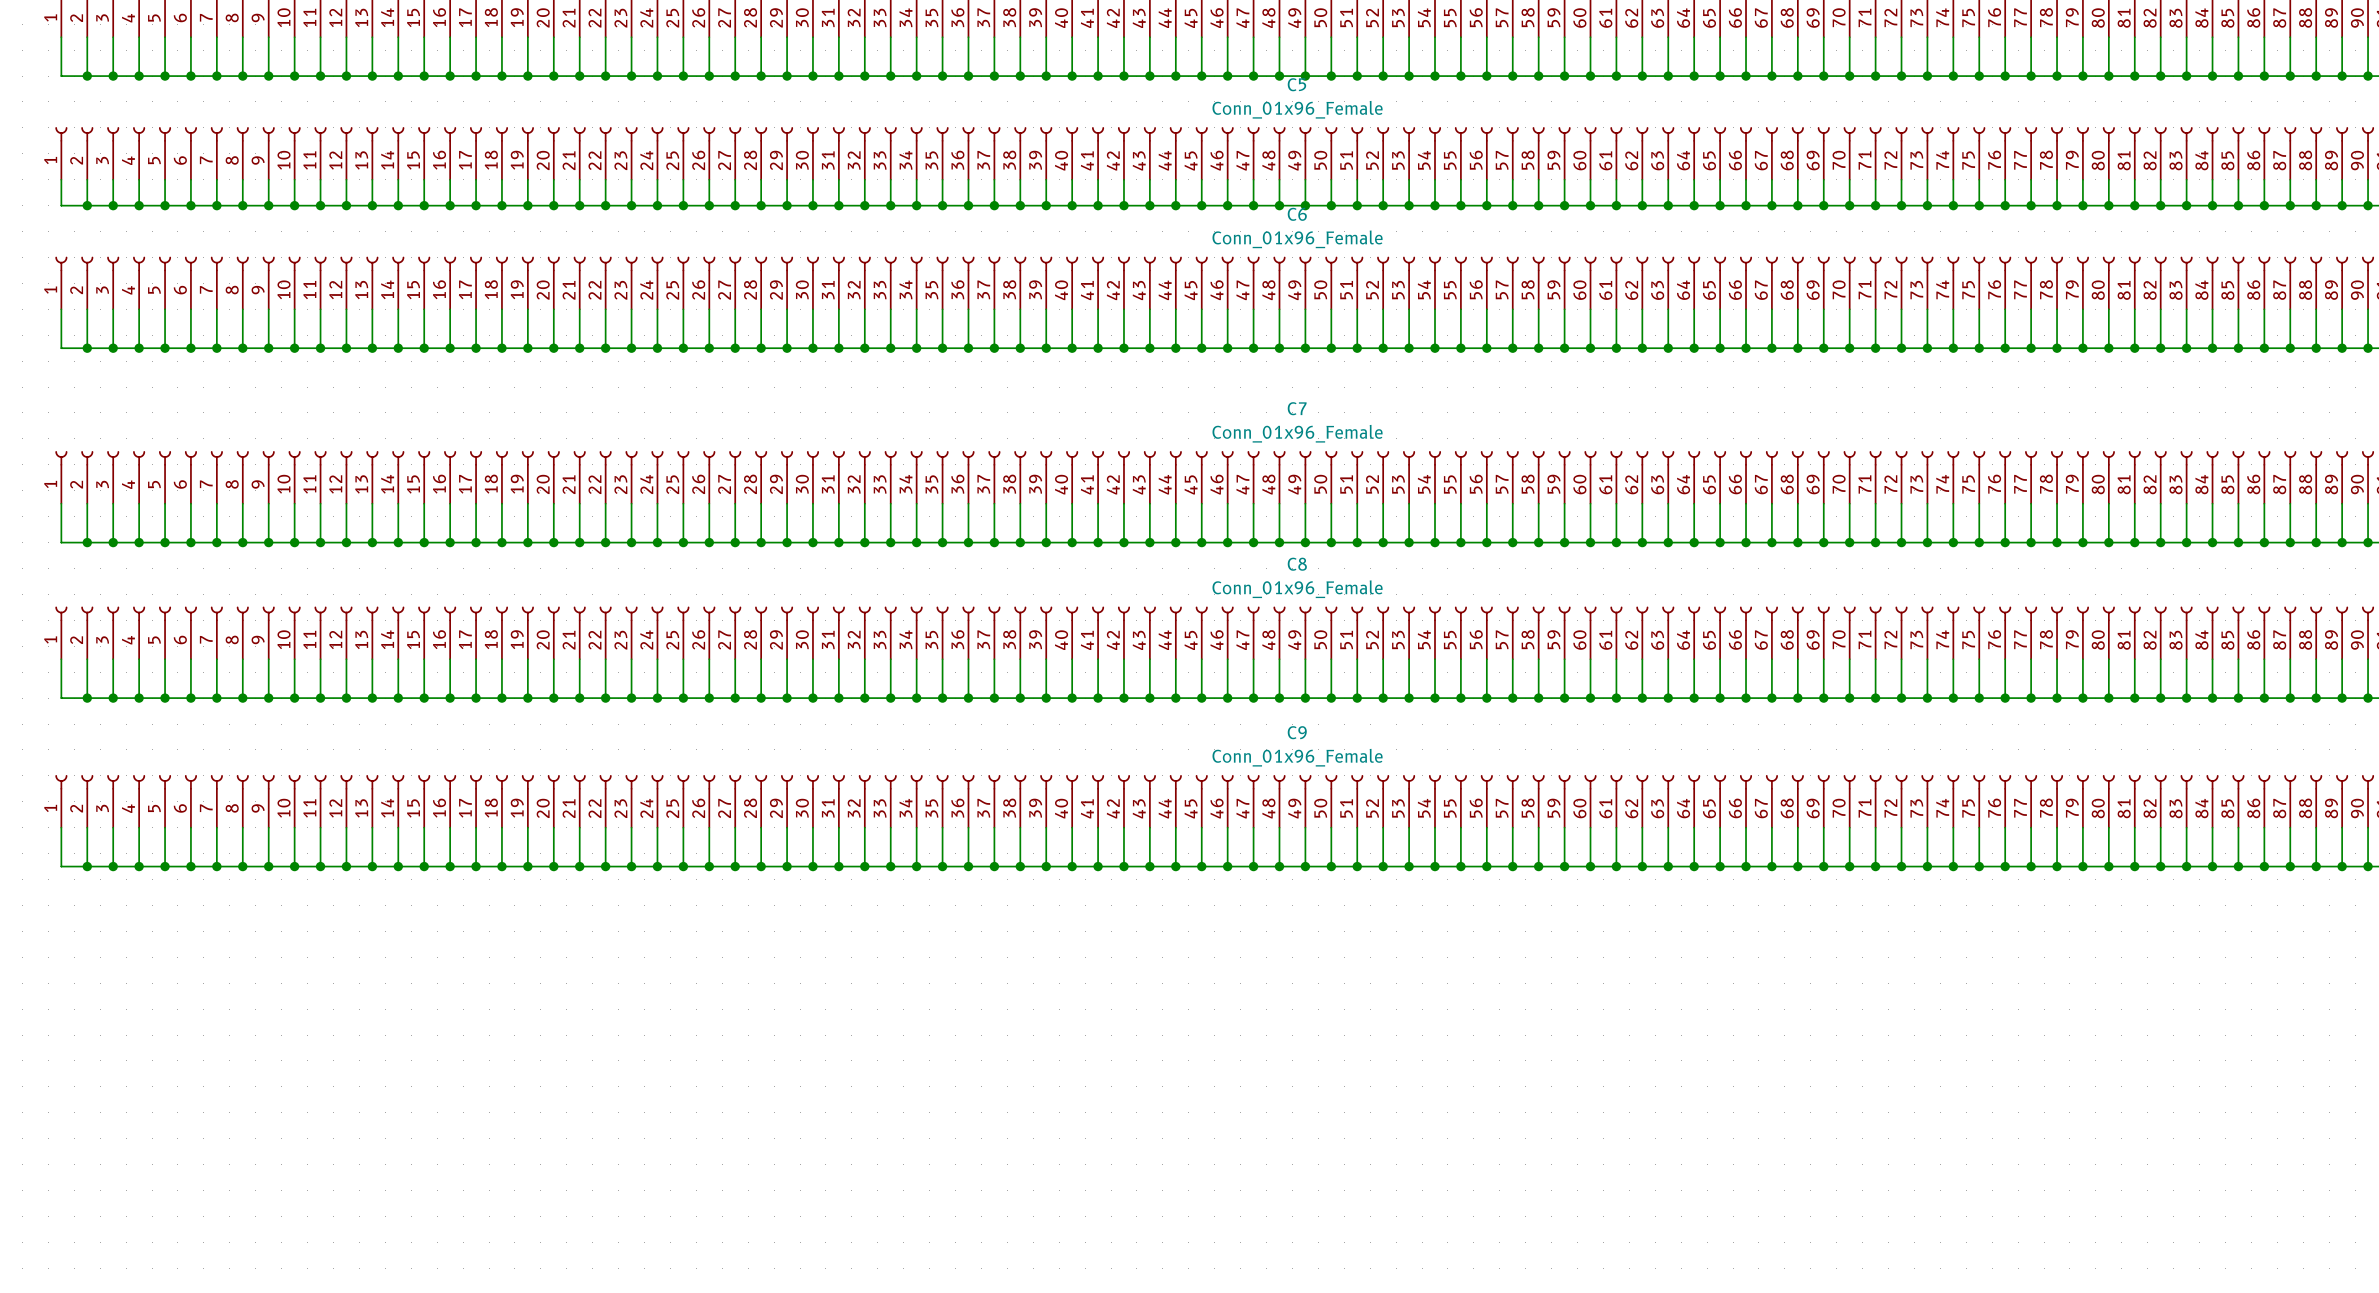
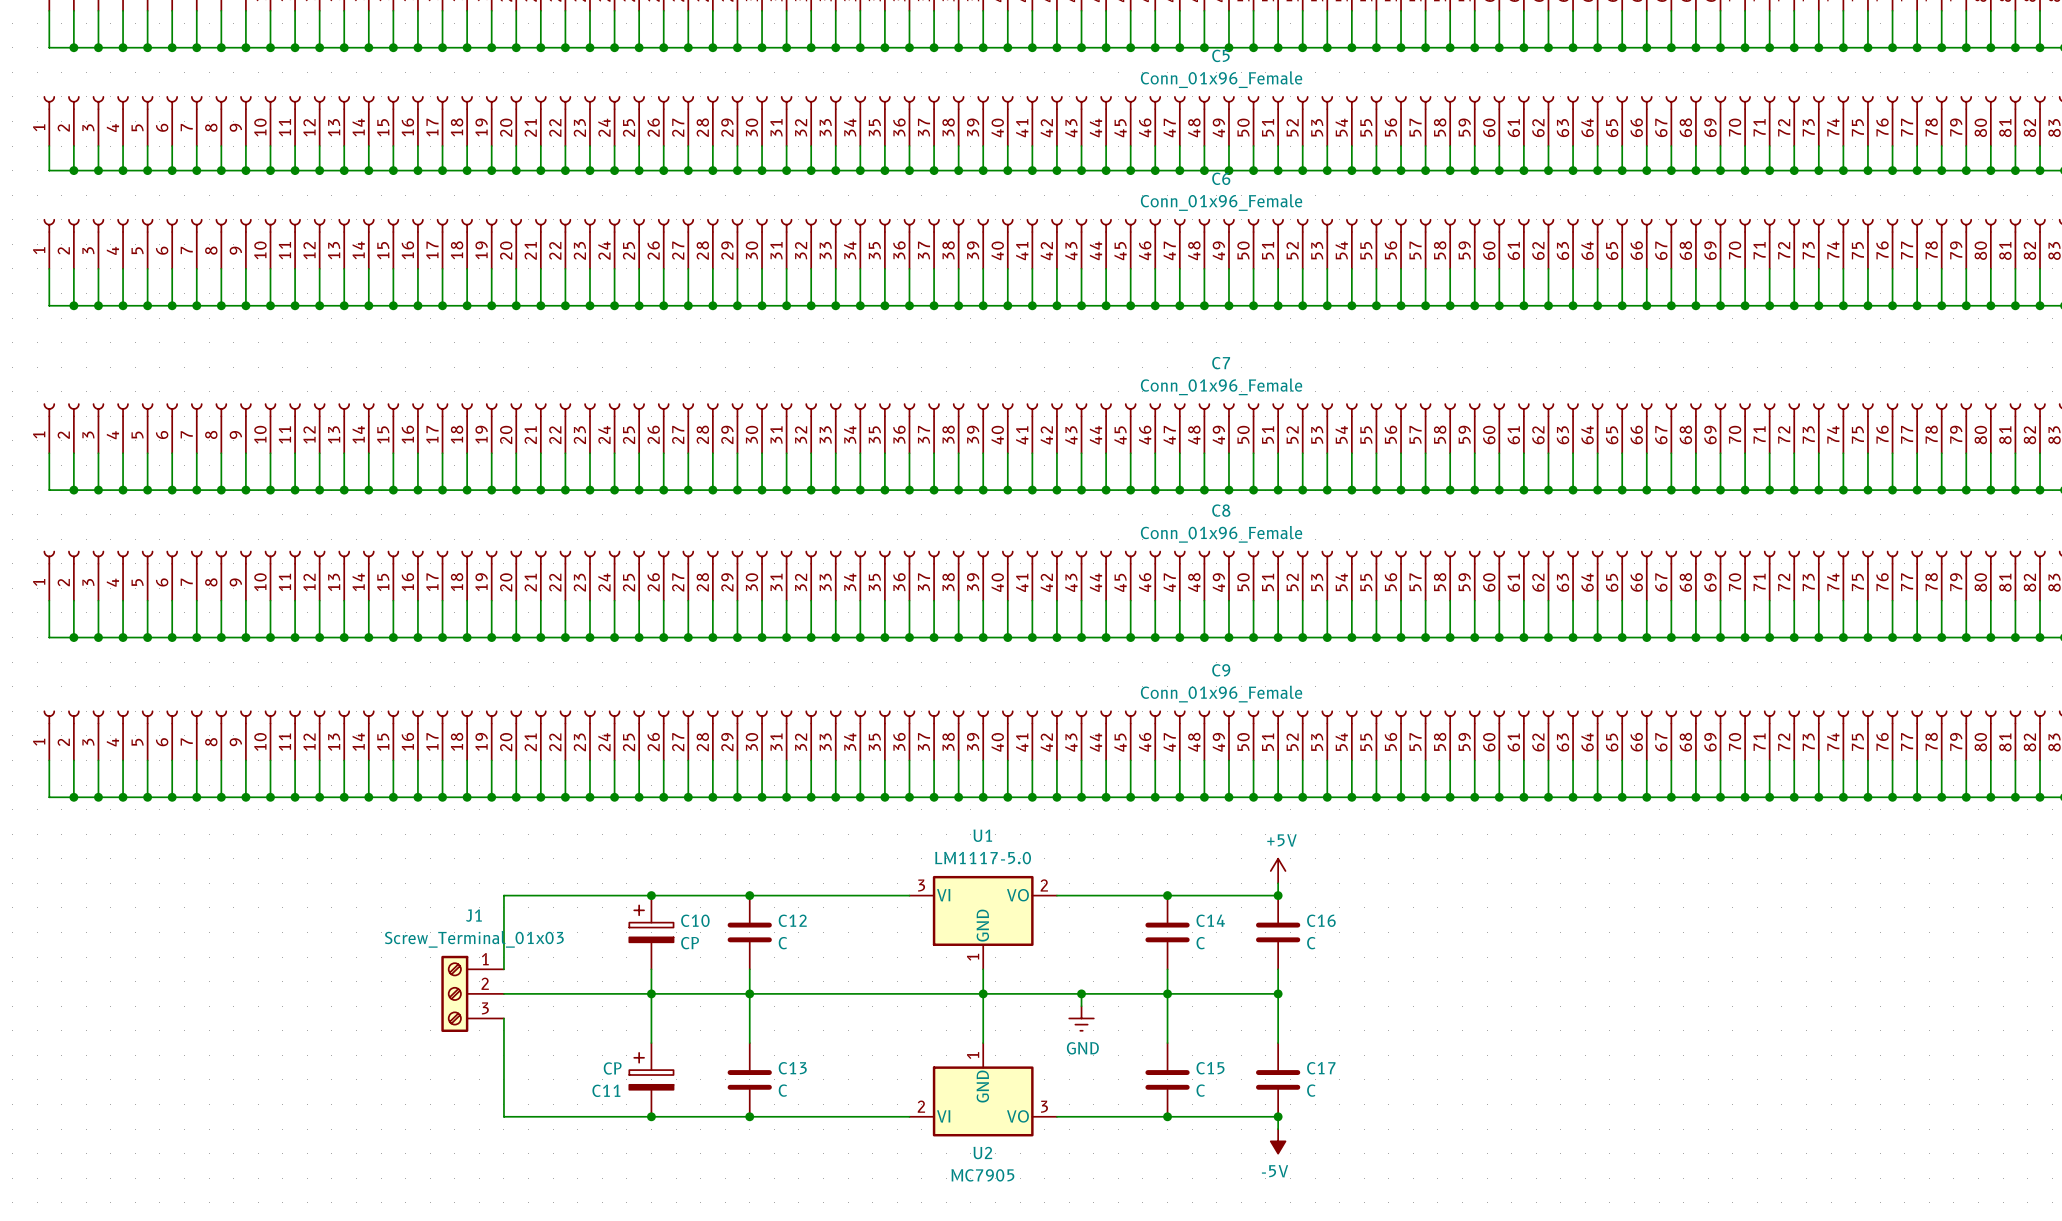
power symbol: none -> +5V (1278, 871)
wire: none -> (1278, 883) (1278, 895) (1056, 895)
junction: none -> (651, 895)
junction: none -> (749, 895)
wire: none -> (909, 895) (503, 895) (503, 969)
junction: none -> (1167, 895)
junction: none -> (1278, 895)
U1: none -> LM1117-5.0 (983, 922)
C10: none -> CP (651, 932)
C12: none -> C (749, 932)
C14: none -> C (1167, 932)
C16: none -> C (1278, 932)
wire: none -> (651, 969) (651, 1043)
wire: none -> (749, 969) (749, 1043)
wire: none -> (983, 969) (983, 1043)
wire: none -> (1167, 969) (1167, 1043)
wire: none -> (1278, 969) (1278, 1043)
J1: none -> Screw_Terminal_01x03 (472, 993)
wire: none -> (503, 993) (1278, 993)
junction: none -> (651, 993)
junction: none -> (749, 993)
junction: none -> (983, 993)
wire: none -> (1081, 993) (1081, 1006)
junction: none -> (1081, 993)
junction: none -> (1167, 993)
junction: none -> (1278, 993)
wire: none -> (503, 1018) (503, 1116) (909, 1116)
power symbol: none -> GND (1081, 1018)
C11: none -> CP (651, 1079)
C13: none -> C (749, 1079)
C15: none -> C (1167, 1079)
C17: none -> C (1278, 1079)
U2: none -> MC7905 (983, 1089)
junction: none -> (651, 1116)
junction: none -> (749, 1116)
wire: none -> (1056, 1116) (1278, 1116) (1278, 1129)
junction: none -> (1167, 1116)
junction: none -> (1278, 1116)
power symbol: none -> -5V (1278, 1141)

